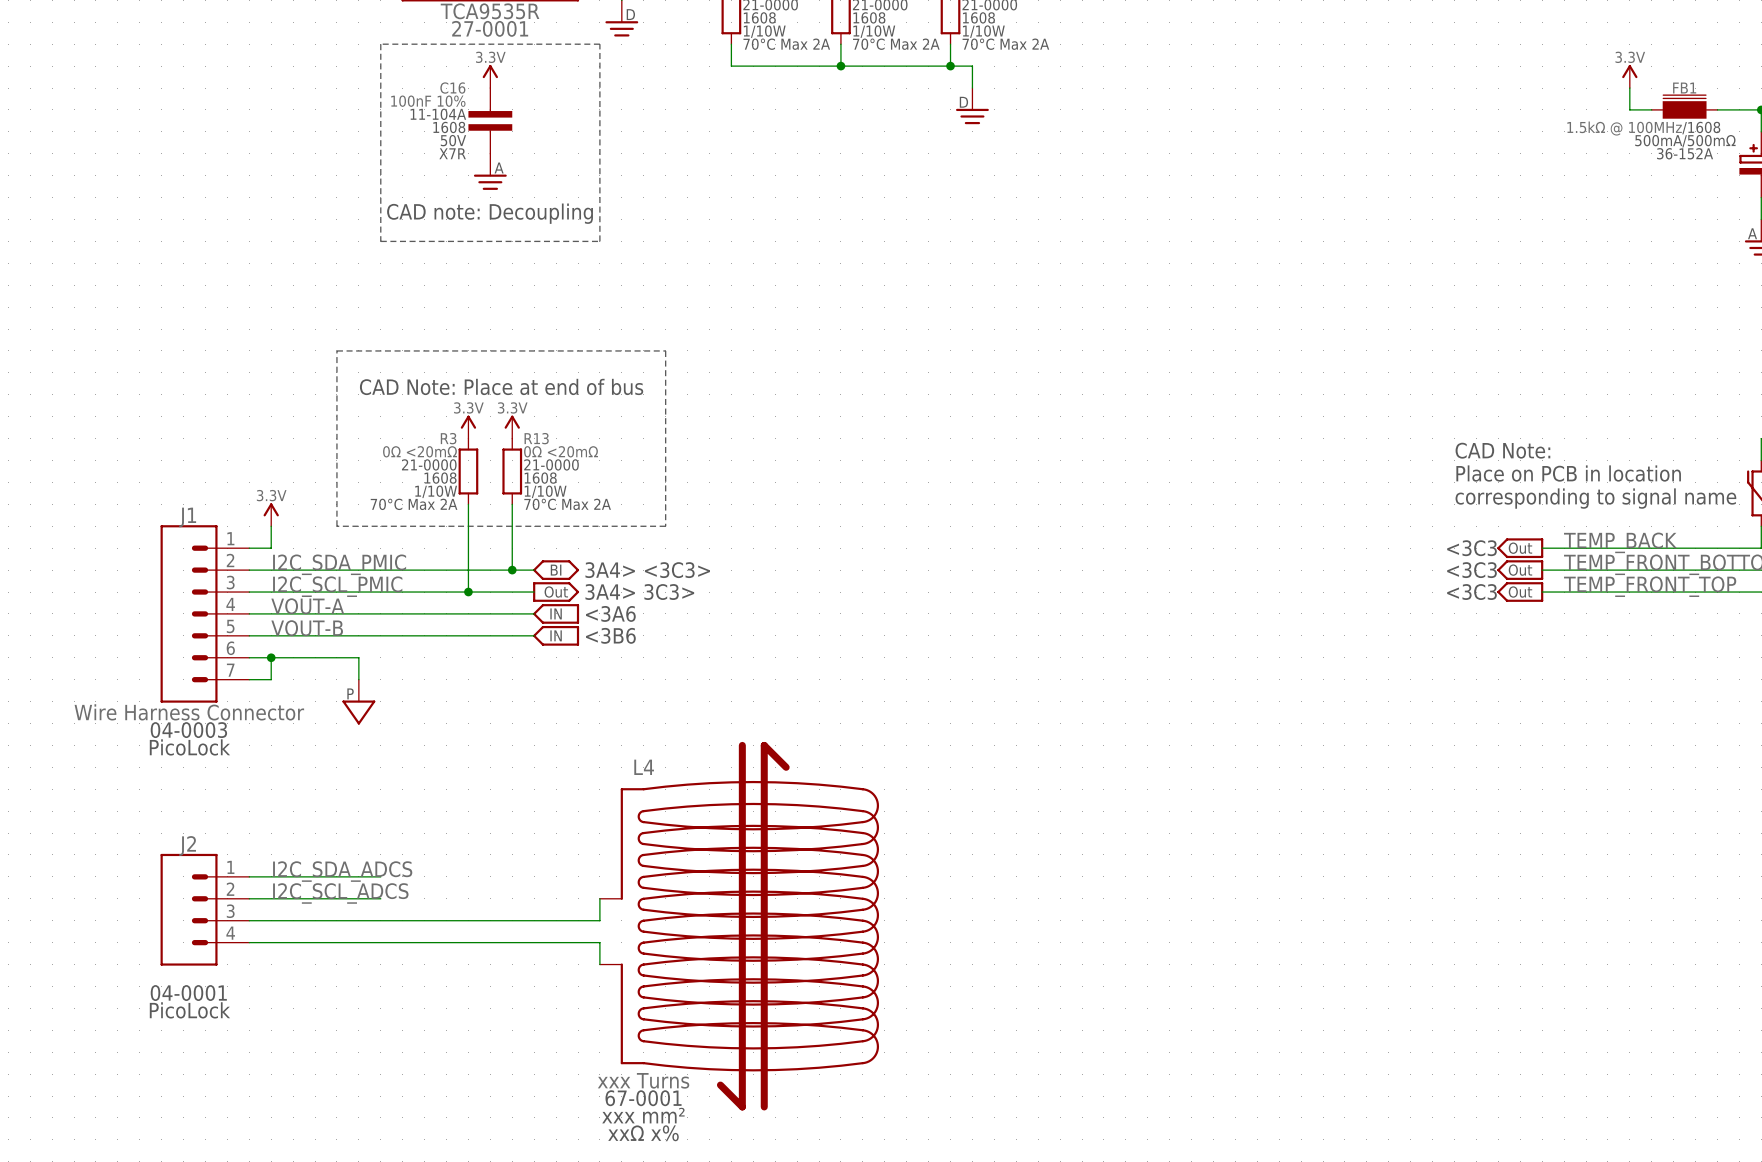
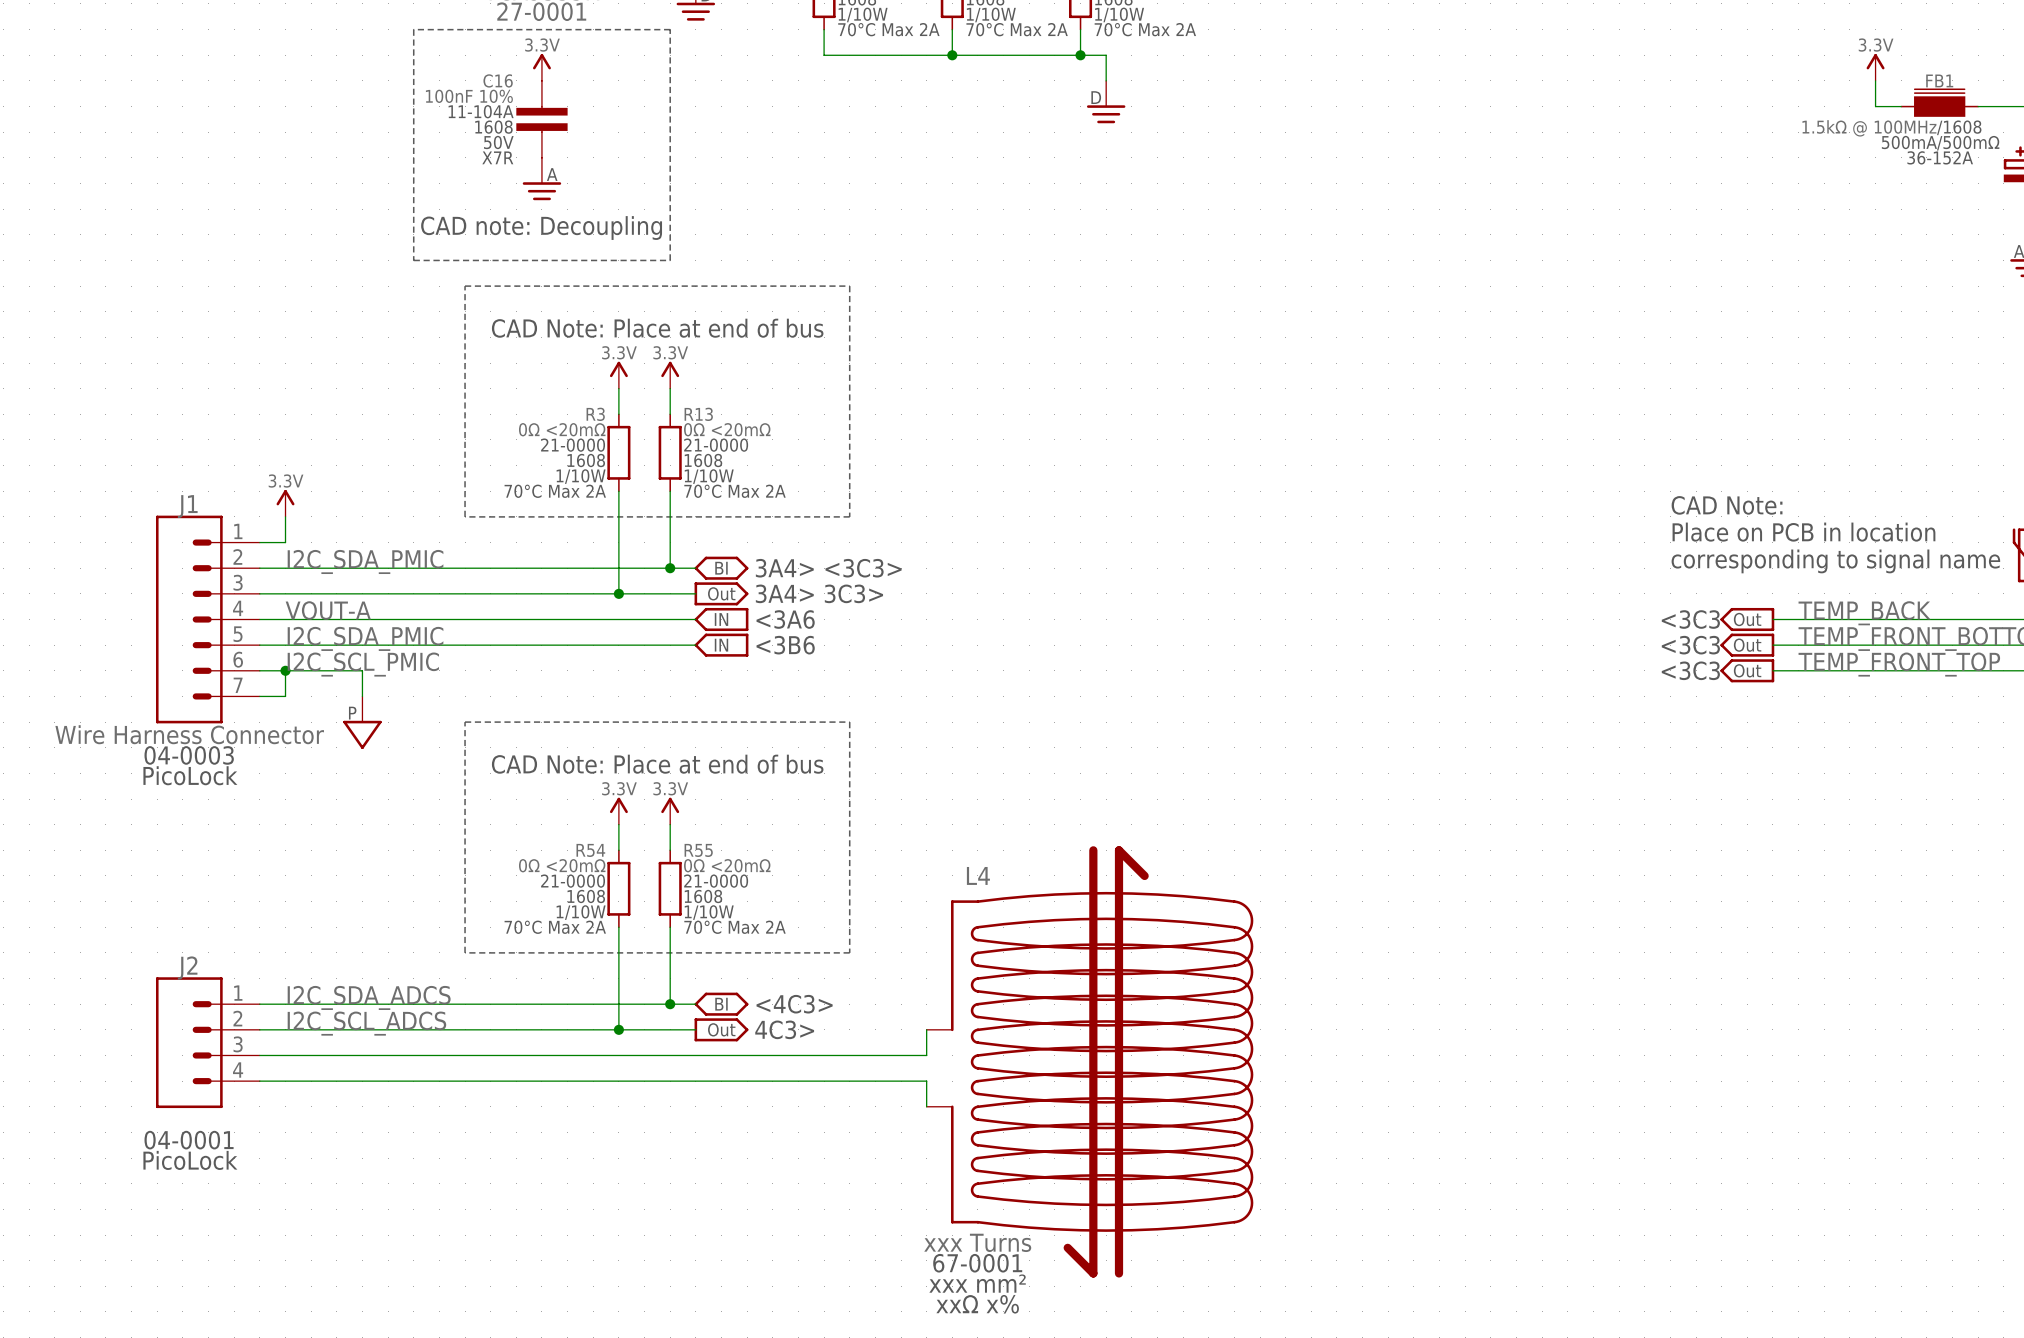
line: none -> (465, 286) (849, 286) (849, 516) (465, 516) (465, 286)
power symbol: none -> 3.3V (618, 375)
power symbol: none -> 3.3V (670, 375)
line: (336, 350) (665, 350) (665, 526) (336, 526) (336, 350) -> none
wire: none -> (618, 388) (618, 414)
wire: none -> (670, 388) (670, 414)
text position: CAD Note: Place at end of bus (501, 386) -> CAD Note: Place at end of bus (657, 328)
power symbol: 3.3V (468, 427) -> none
power symbol: 3.3V (512, 427) -> none
R3 position: (468, 471) -> (618, 452)
R13 position: (512, 471) -> (670, 452)
label: none -> I2C_SDA_PMIC (365, 561)
wire: none -> (259, 568) (695, 568)
wire: (468, 504) (468, 592) -> (618, 491) (618, 593)
wire: (512, 504) (512, 570) -> (670, 491) (670, 568)
junction: none -> (670, 568)
power symbol position: 3.3V (271, 514) -> 3.3V (285, 503)
wire: none -> (259, 593) (695, 593)
wire: (271, 526) (271, 548) -> (695, 619) (285, 619)
junction: none -> (618, 593)
part: none -> (721, 619)
junction: (512, 570) -> none
wire: none -> (593, 645) (695, 645)
part position: (556, 570) -> (721, 568)
part: none -> (721, 645)
text position: 3A4> <3C3> (647, 570) -> 3A4> <3C3> (828, 568)
junction: none -> (285, 670)
wire: (336, 592) (534, 592) -> (362, 670) (362, 696)
junction: (468, 592) -> none
part position: (556, 592) -> (721, 593)
text position: 3A4> 3C3> (639, 592) -> 3A4> 3C3> (819, 593)
label position: VOUT-A (307, 606) -> VOUT-A (328, 610)
J1 position: (204, 613) -> (207, 619)
wire: (271, 613) (534, 613) -> (285, 696) (285, 670)
part: (556, 613) -> none
text position: <3A6 (610, 613) -> <3A6 (785, 619)
label: VOUT-B (307, 628) -> none
wire: (249, 635) (534, 635) -> none
line: none -> (465, 722) (465, 952) (849, 952) (849, 722) (465, 722)
part: (556, 635) -> none
text position: <3B6 (610, 635) -> <3B6 (785, 645)
wire: (249, 657) (358, 657) (358, 679) -> none
wire: (271, 657) (271, 679) (249, 679) -> (285, 516) (285, 542) (259, 542)
junction: (271, 657) -> none
text: none -> CAD Note: Place at end of bus (657, 764)
power symbol position: (358, 702) -> (362, 722)
power symbol: none -> 3.3V (618, 811)
power symbol: none -> 3.3V (670, 811)
wire: none -> (618, 824) (618, 850)
wire: none -> (670, 824) (670, 850)
R54: none -> 0Ω <20mΩ (618, 888)
R55: none -> 0Ω <20mΩ (670, 888)
wire: none -> (618, 927) (618, 1029)
wire: none -> (670, 927) (670, 1004)
wire: none -> (413, 1004) (695, 1004)
junction: none -> (670, 1004)
part: none -> (721, 1004)
text: none -> <4C3> (794, 1004)
wire: none -> (413, 1029) (695, 1029)
junction: none -> (618, 1029)
wire: (599, 898) (599, 920) -> (926, 1029) (926, 1055) (670, 1055)
part: none -> (721, 1029)
text: none -> 4C3> (784, 1029)
L4 position: (739, 926) -> (1089, 1061)
wire: (599, 942) (599, 964) -> (670, 1081) (926, 1081) (926, 1106)

